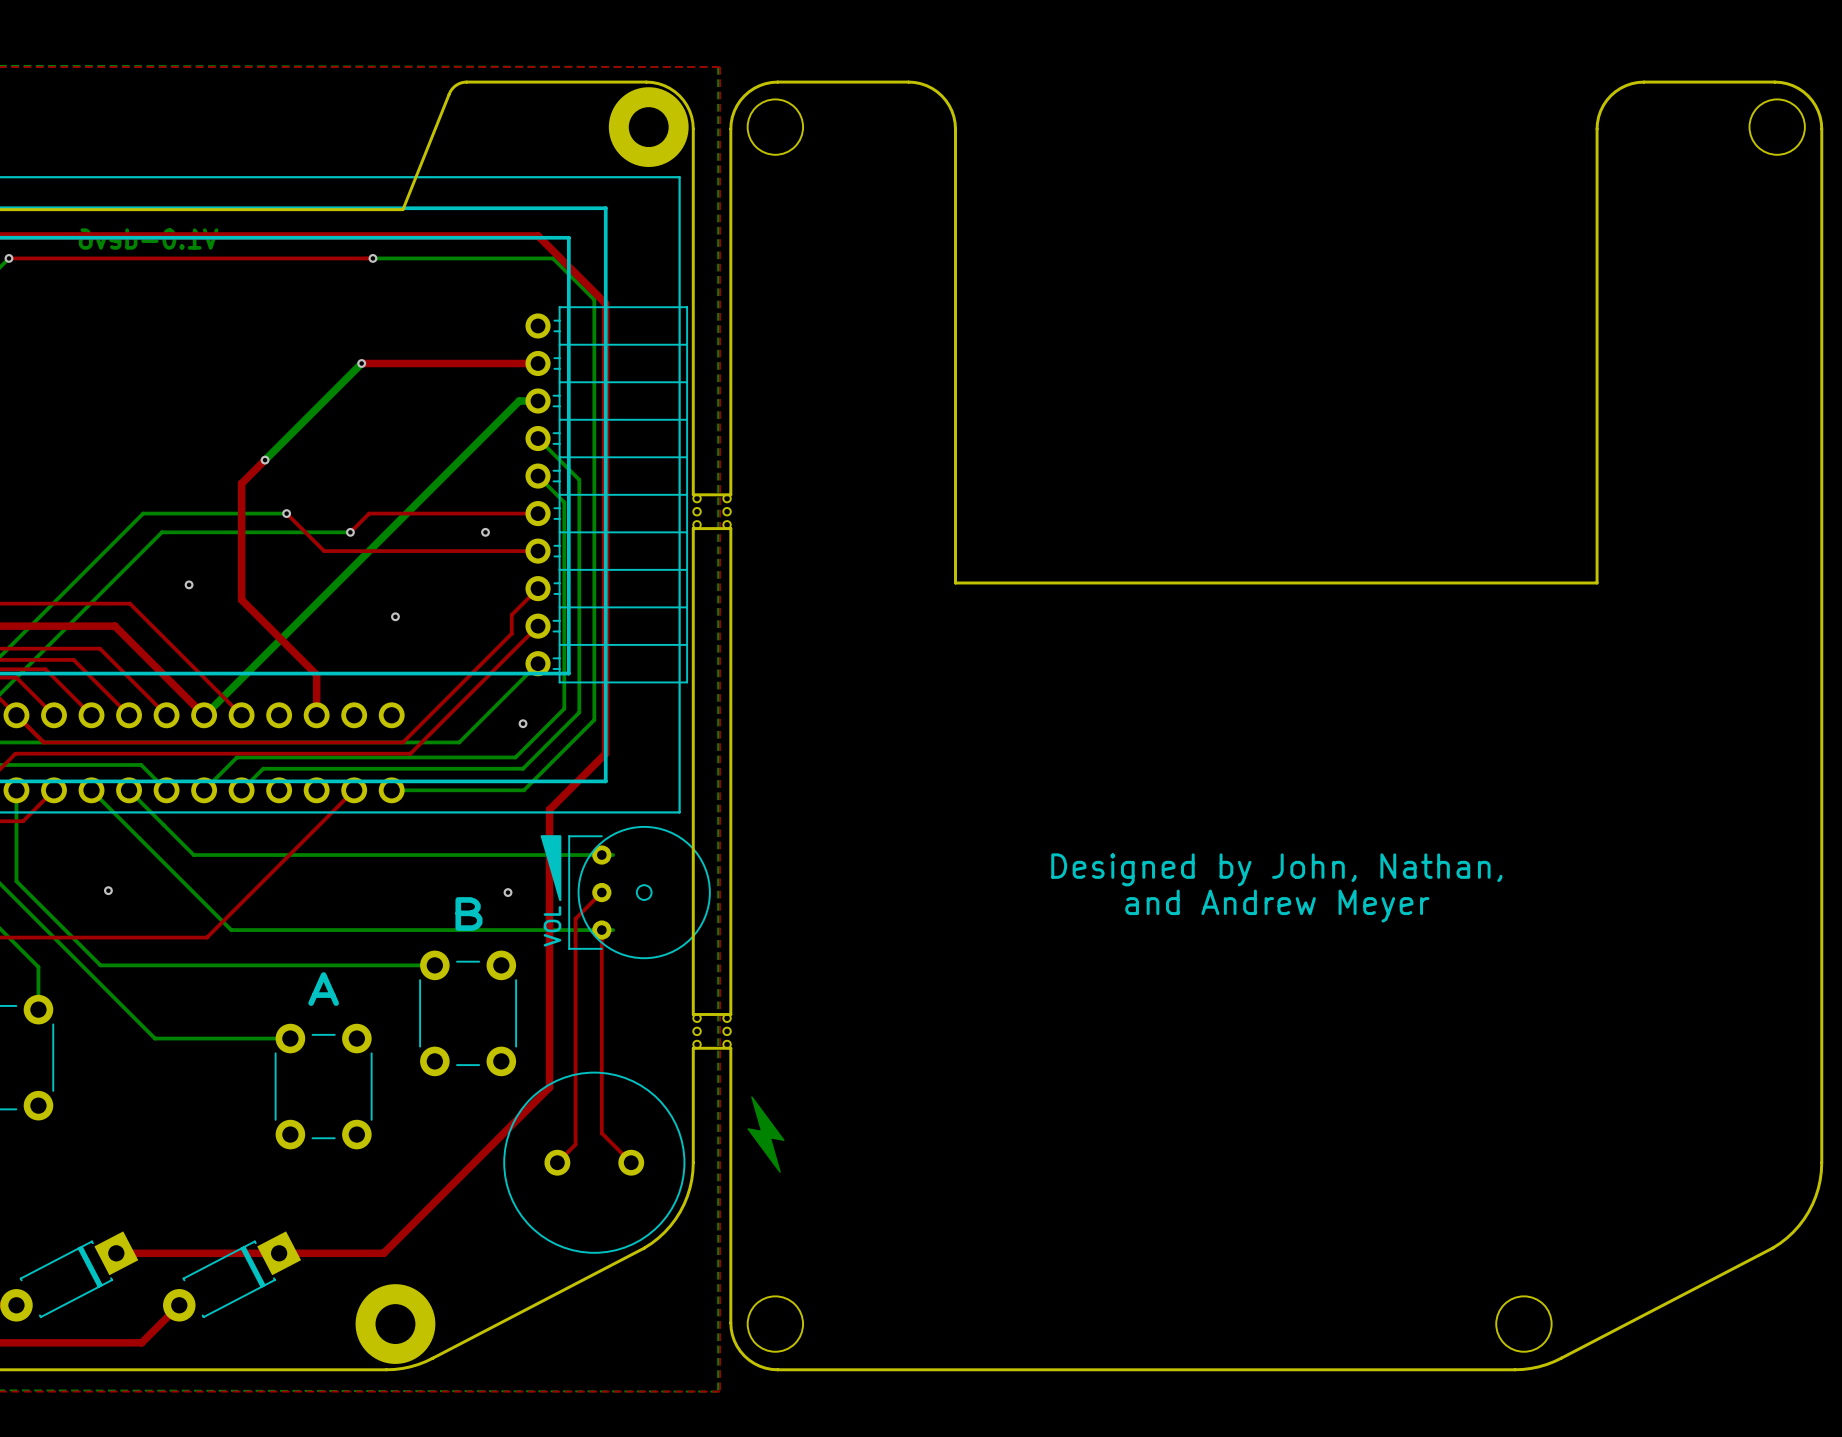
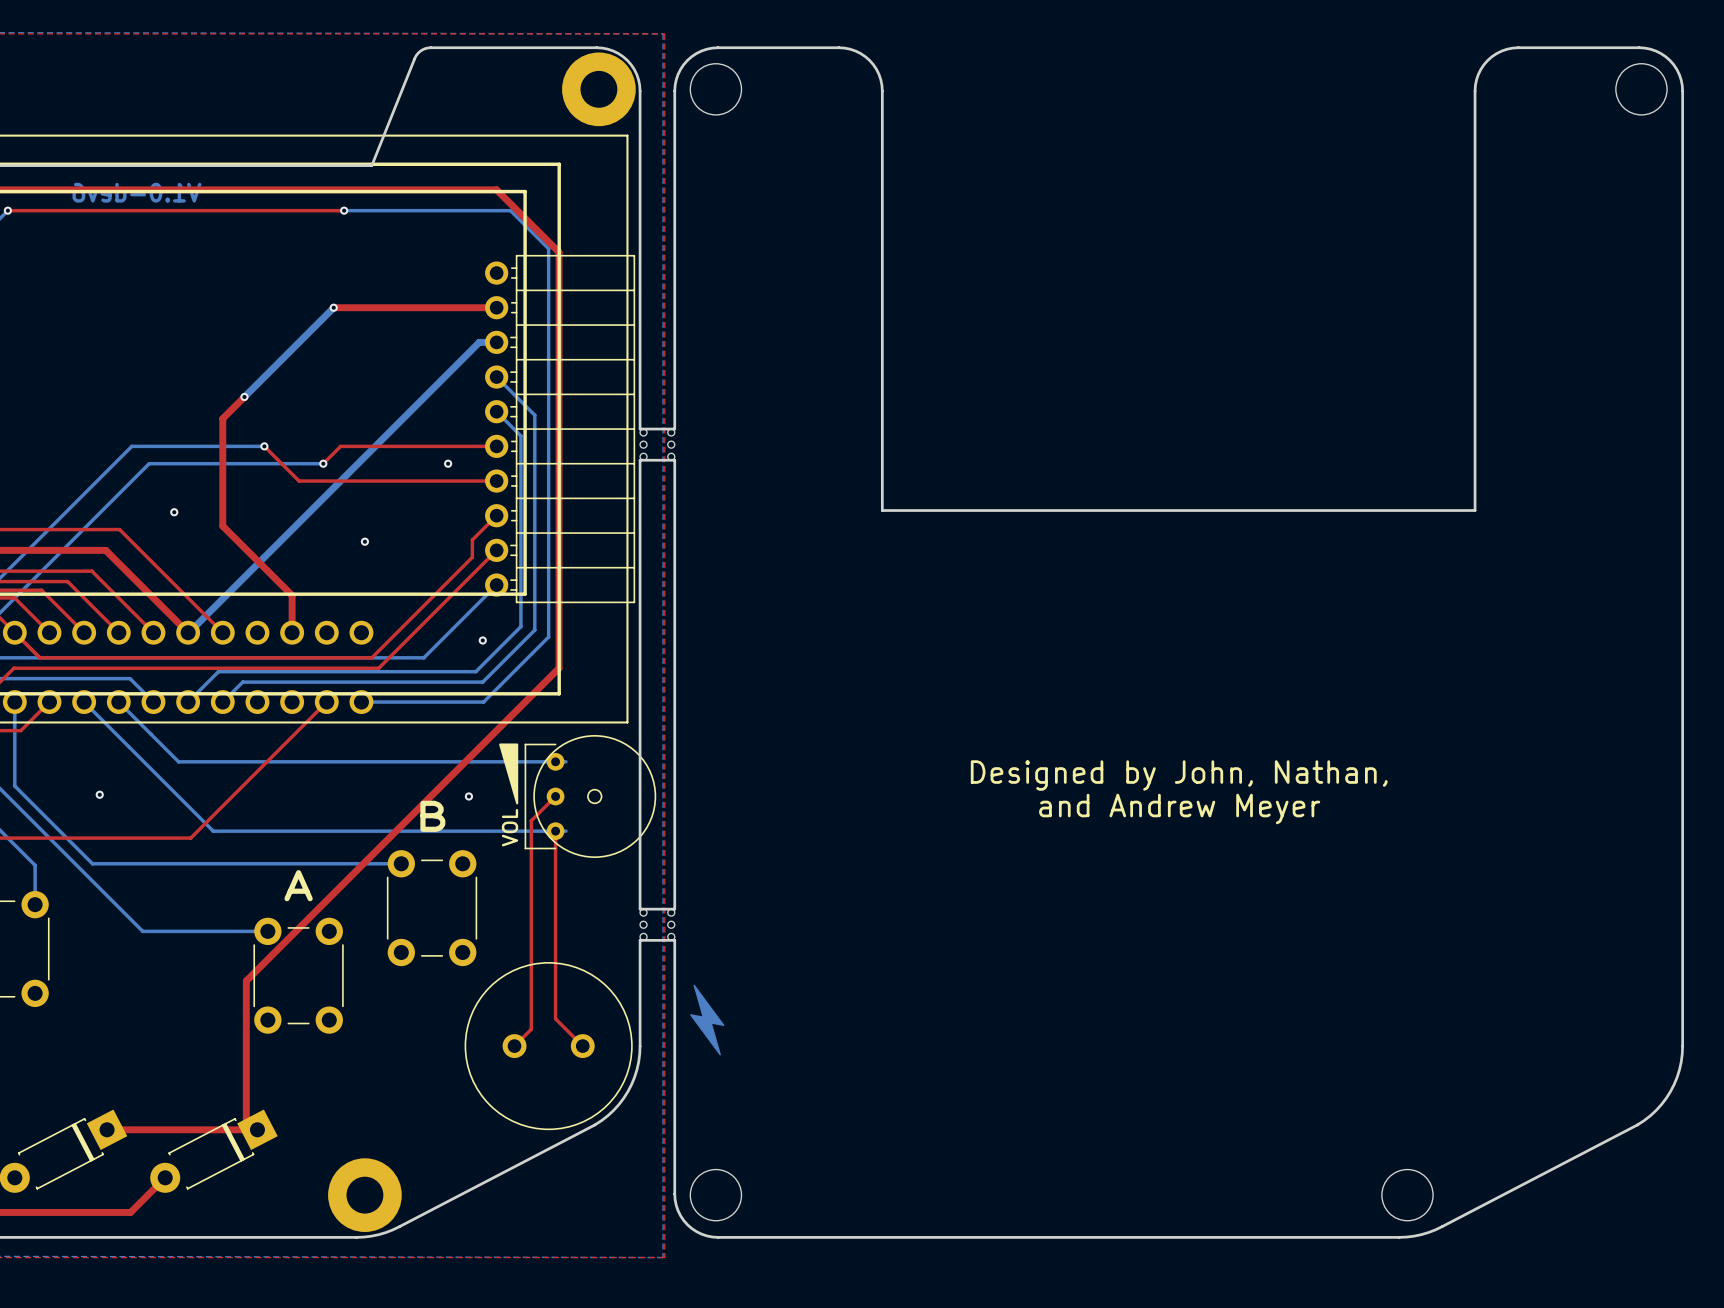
top track: (549, 809) (549, 1087) (383, 1253) (279, 1253) -> (507, 720) (246, 980) (246, 1118) (257, 1129)

